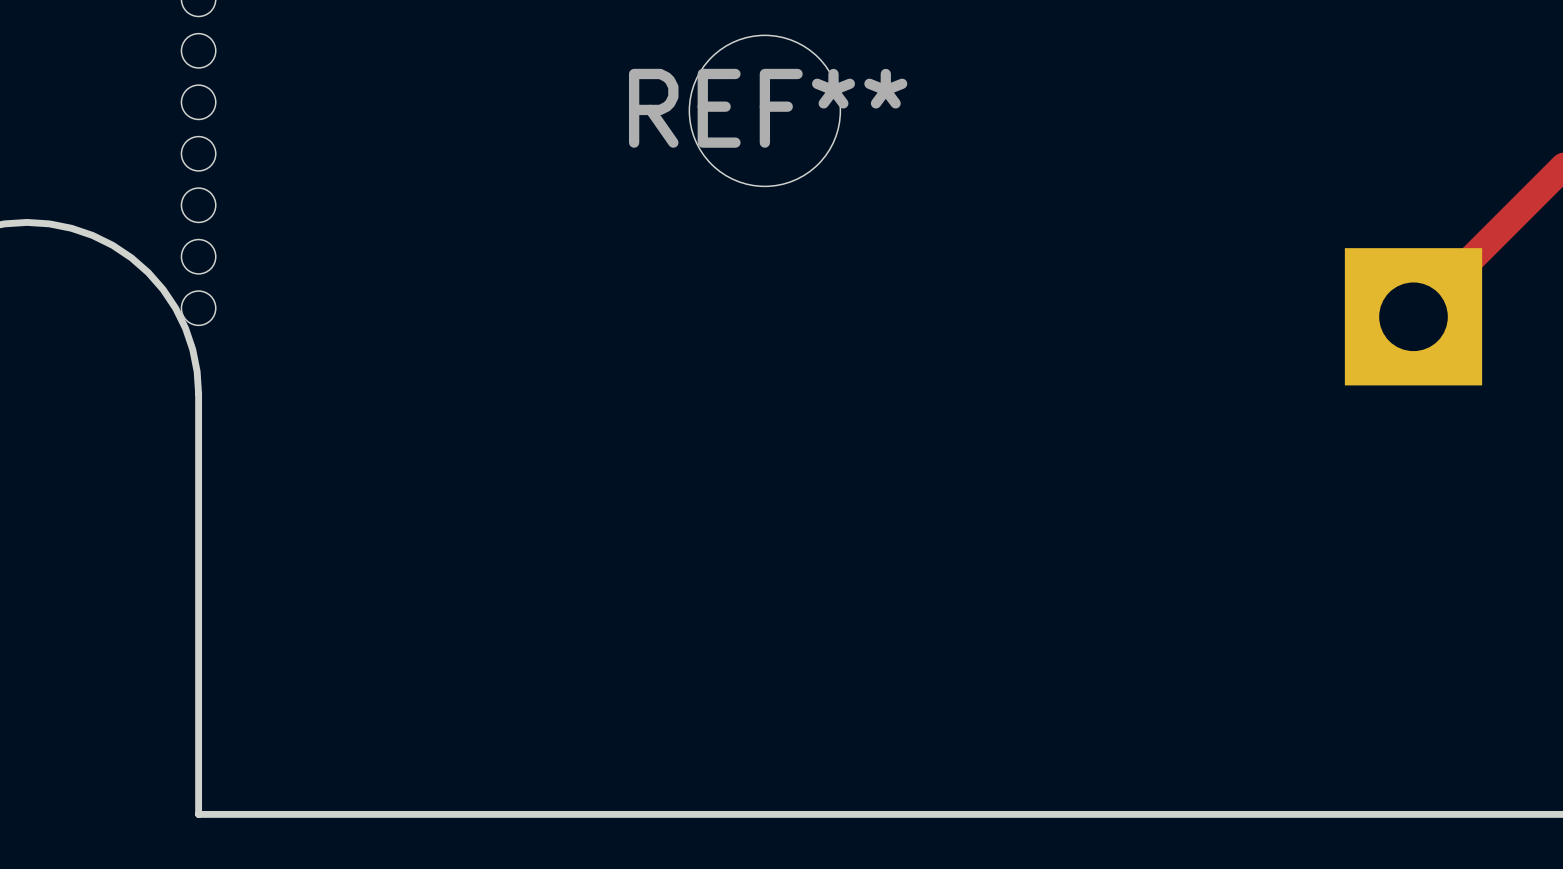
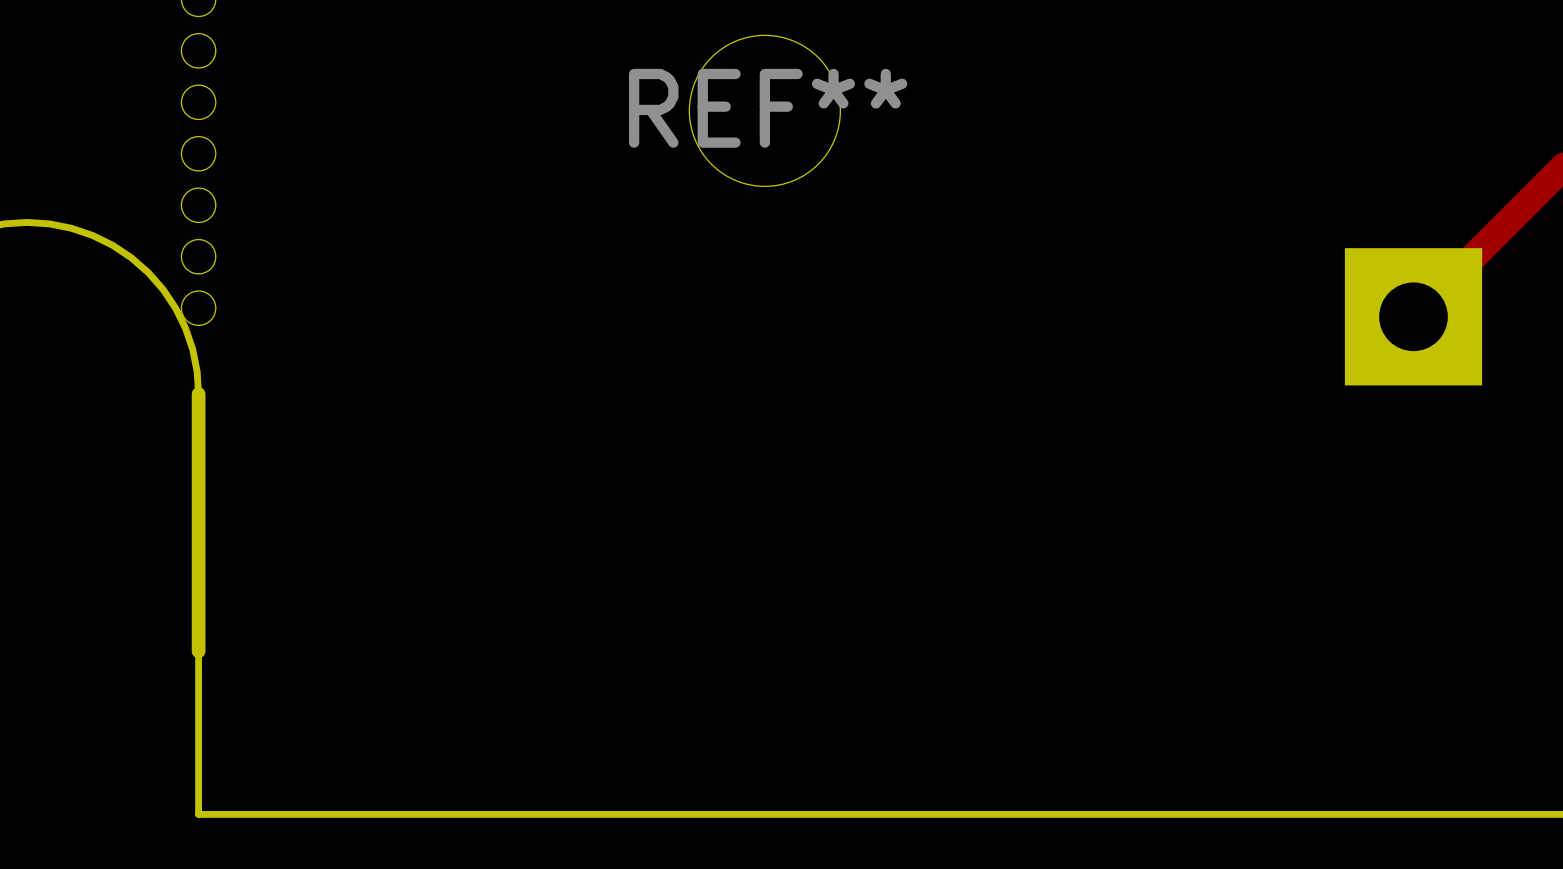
board edge width: thin (198, 394) (198, 651) -> thick (198, 394) (198, 651)

